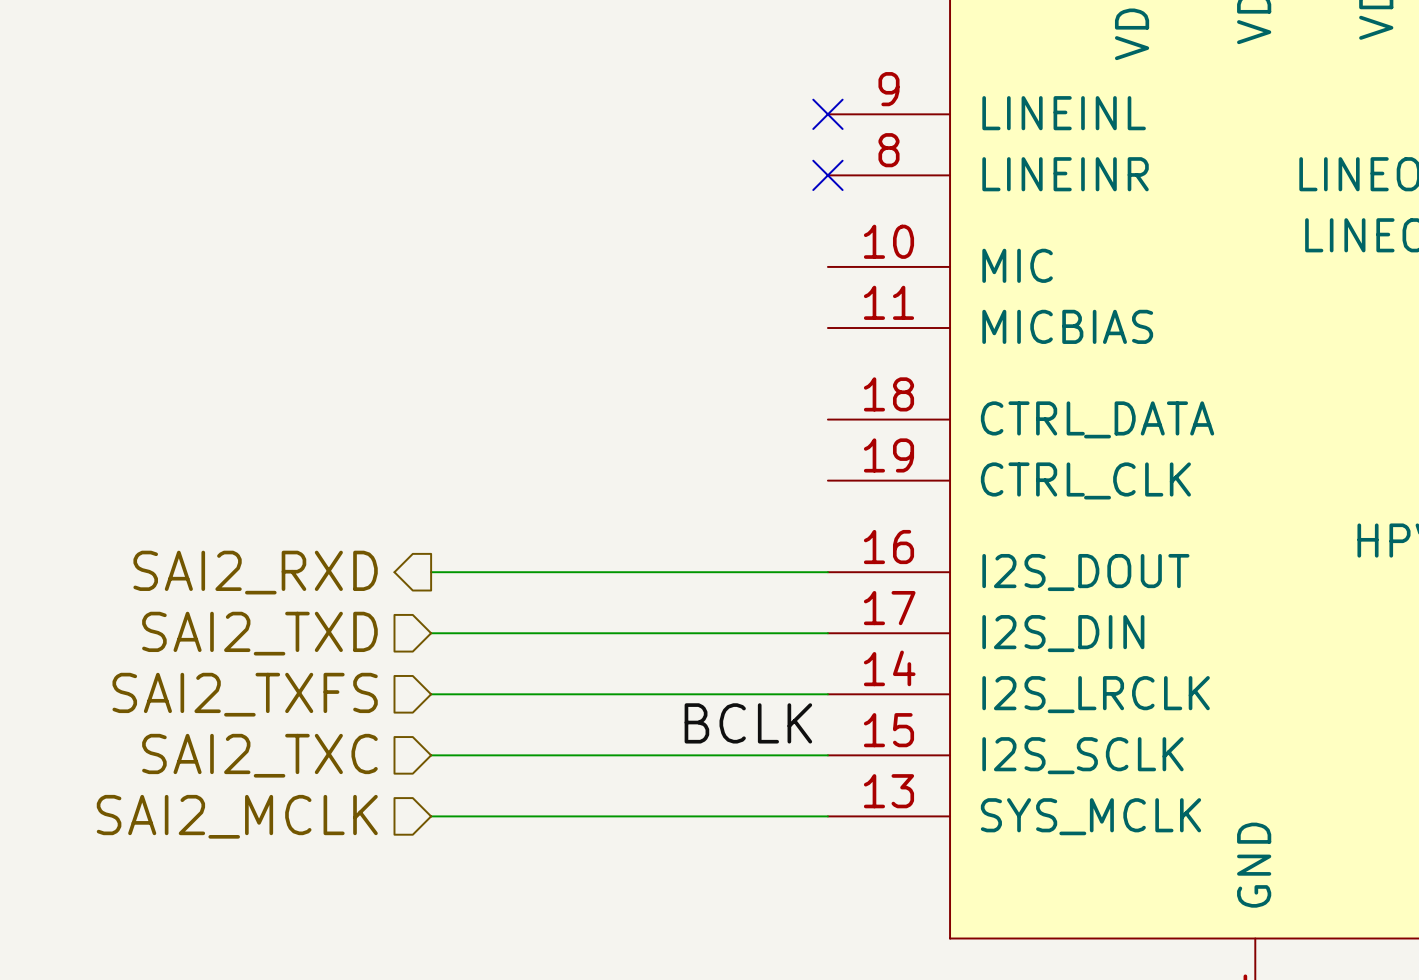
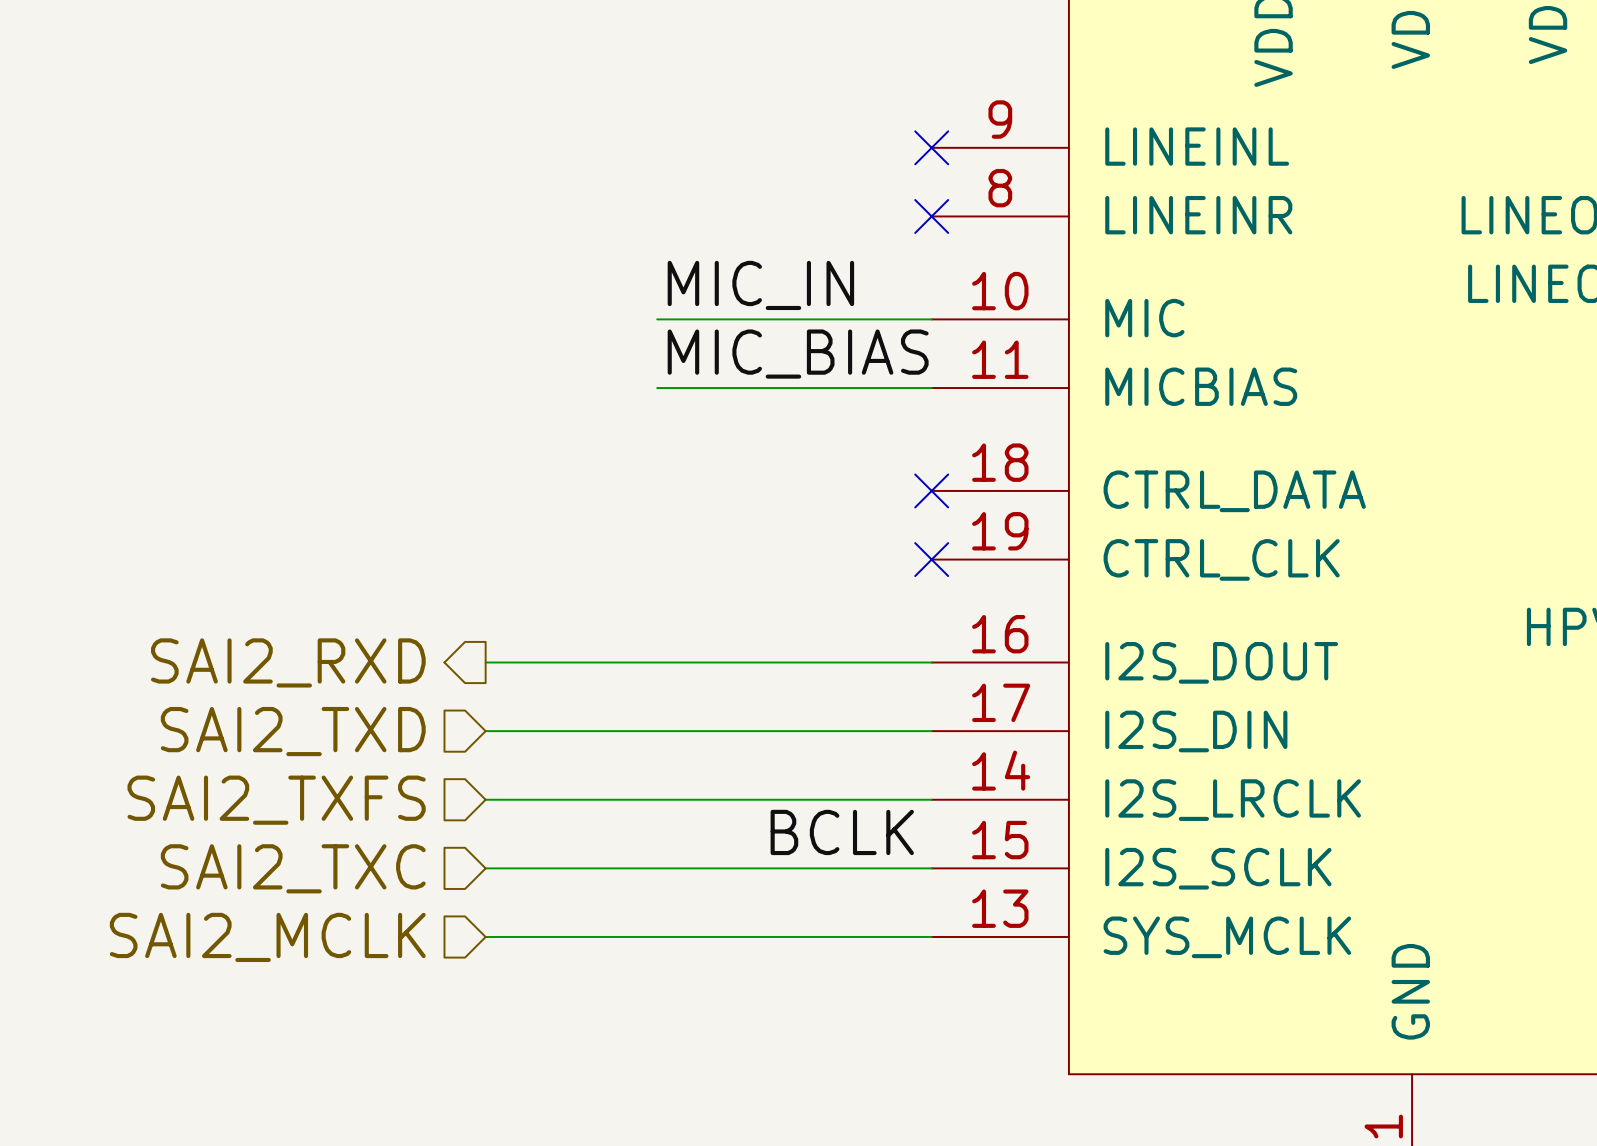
label: none -> MIC_IN (760, 285)
wire: none -> (657, 319) (931, 319)
label: none -> MIC_BIAS (798, 354)
wire: none -> (657, 388) (931, 388)
no-connect mark: none -> (931, 490)
no-connect mark: none -> (931, 559)

